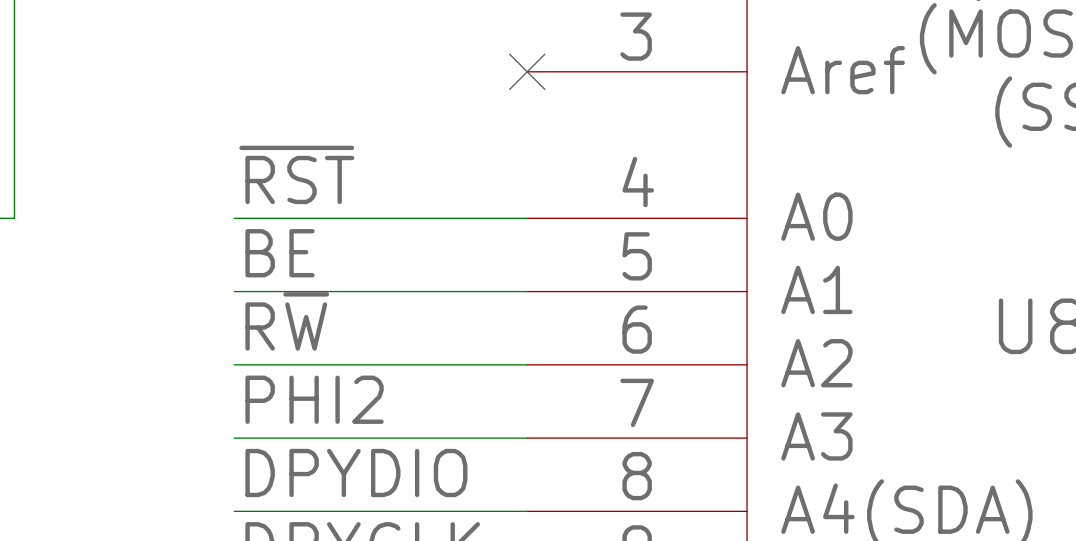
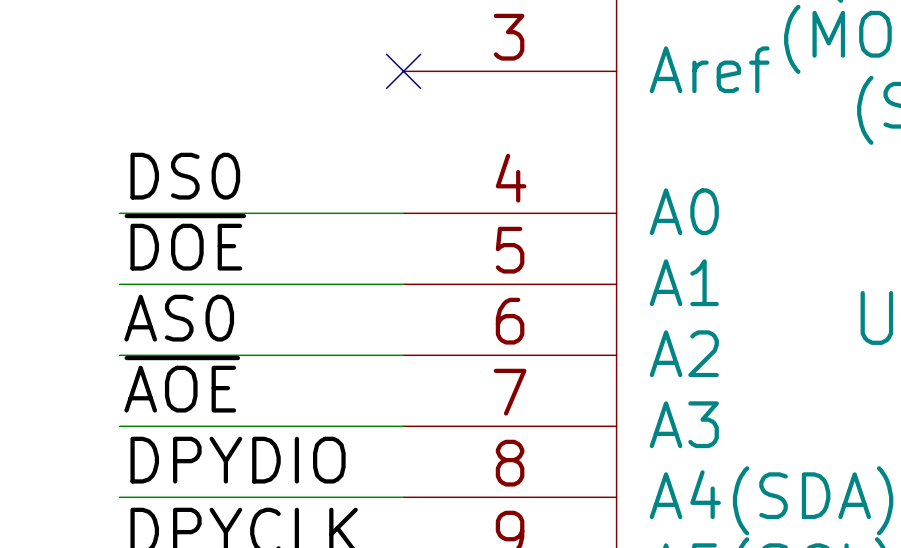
label: ~{RST} (296, 174) -> DS0 (185, 176)
label: BE (280, 253) -> ~{DOE} (185, 242)
label: R~{W} (287, 321) -> AS0 (179, 318)
label: PHI2 (314, 399) -> ~{AOE} (182, 384)

